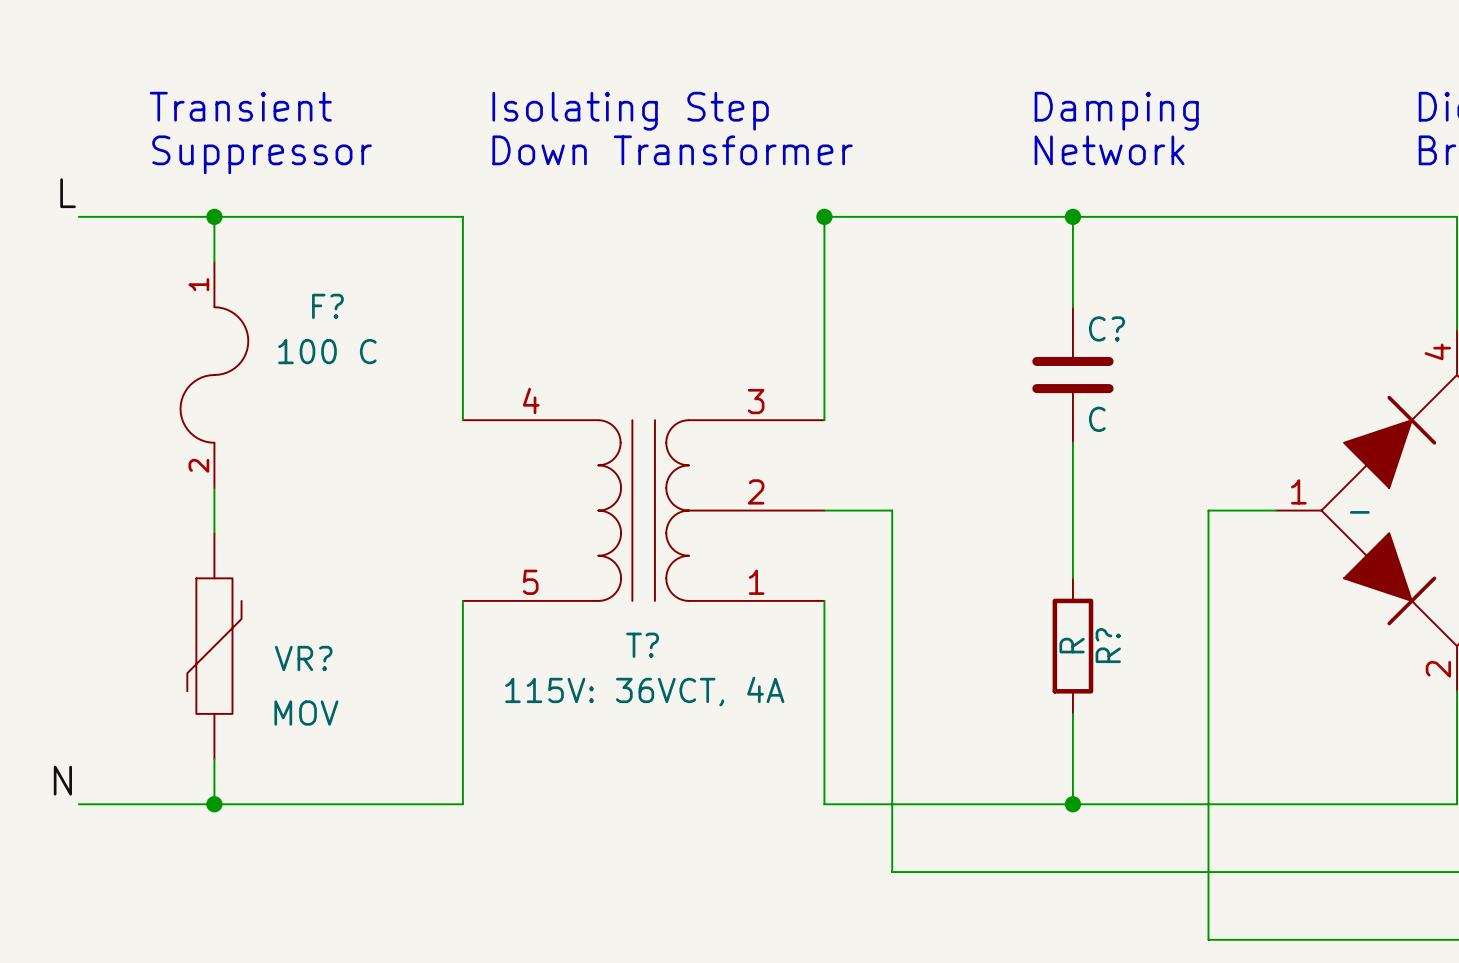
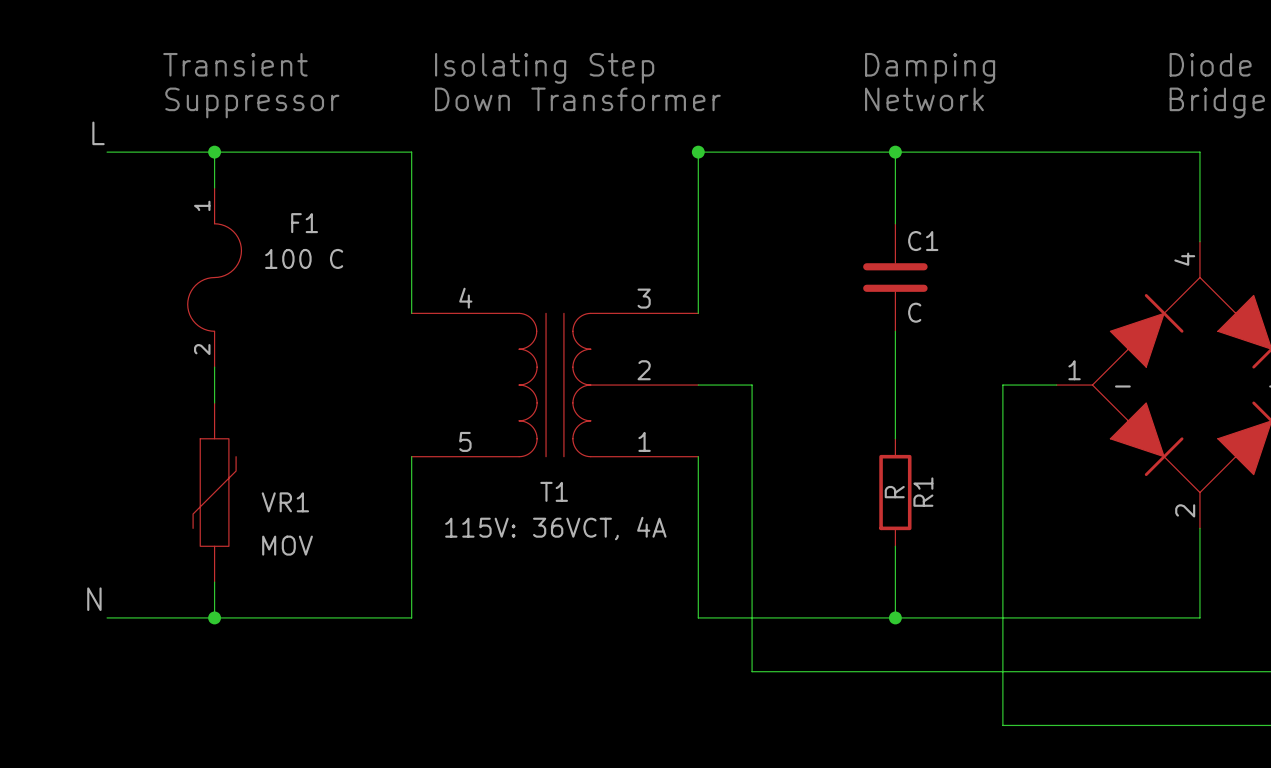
F? name: F? (327, 306) -> F1 (304, 223)
C? name: C? (1107, 328) -> C1 (923, 241)
T? name: T? (642, 645) -> T1 (554, 491)
R? name: R? (1108, 645) -> R1 (923, 492)
VR? name: VR? (303, 658) -> VR1 (285, 502)

